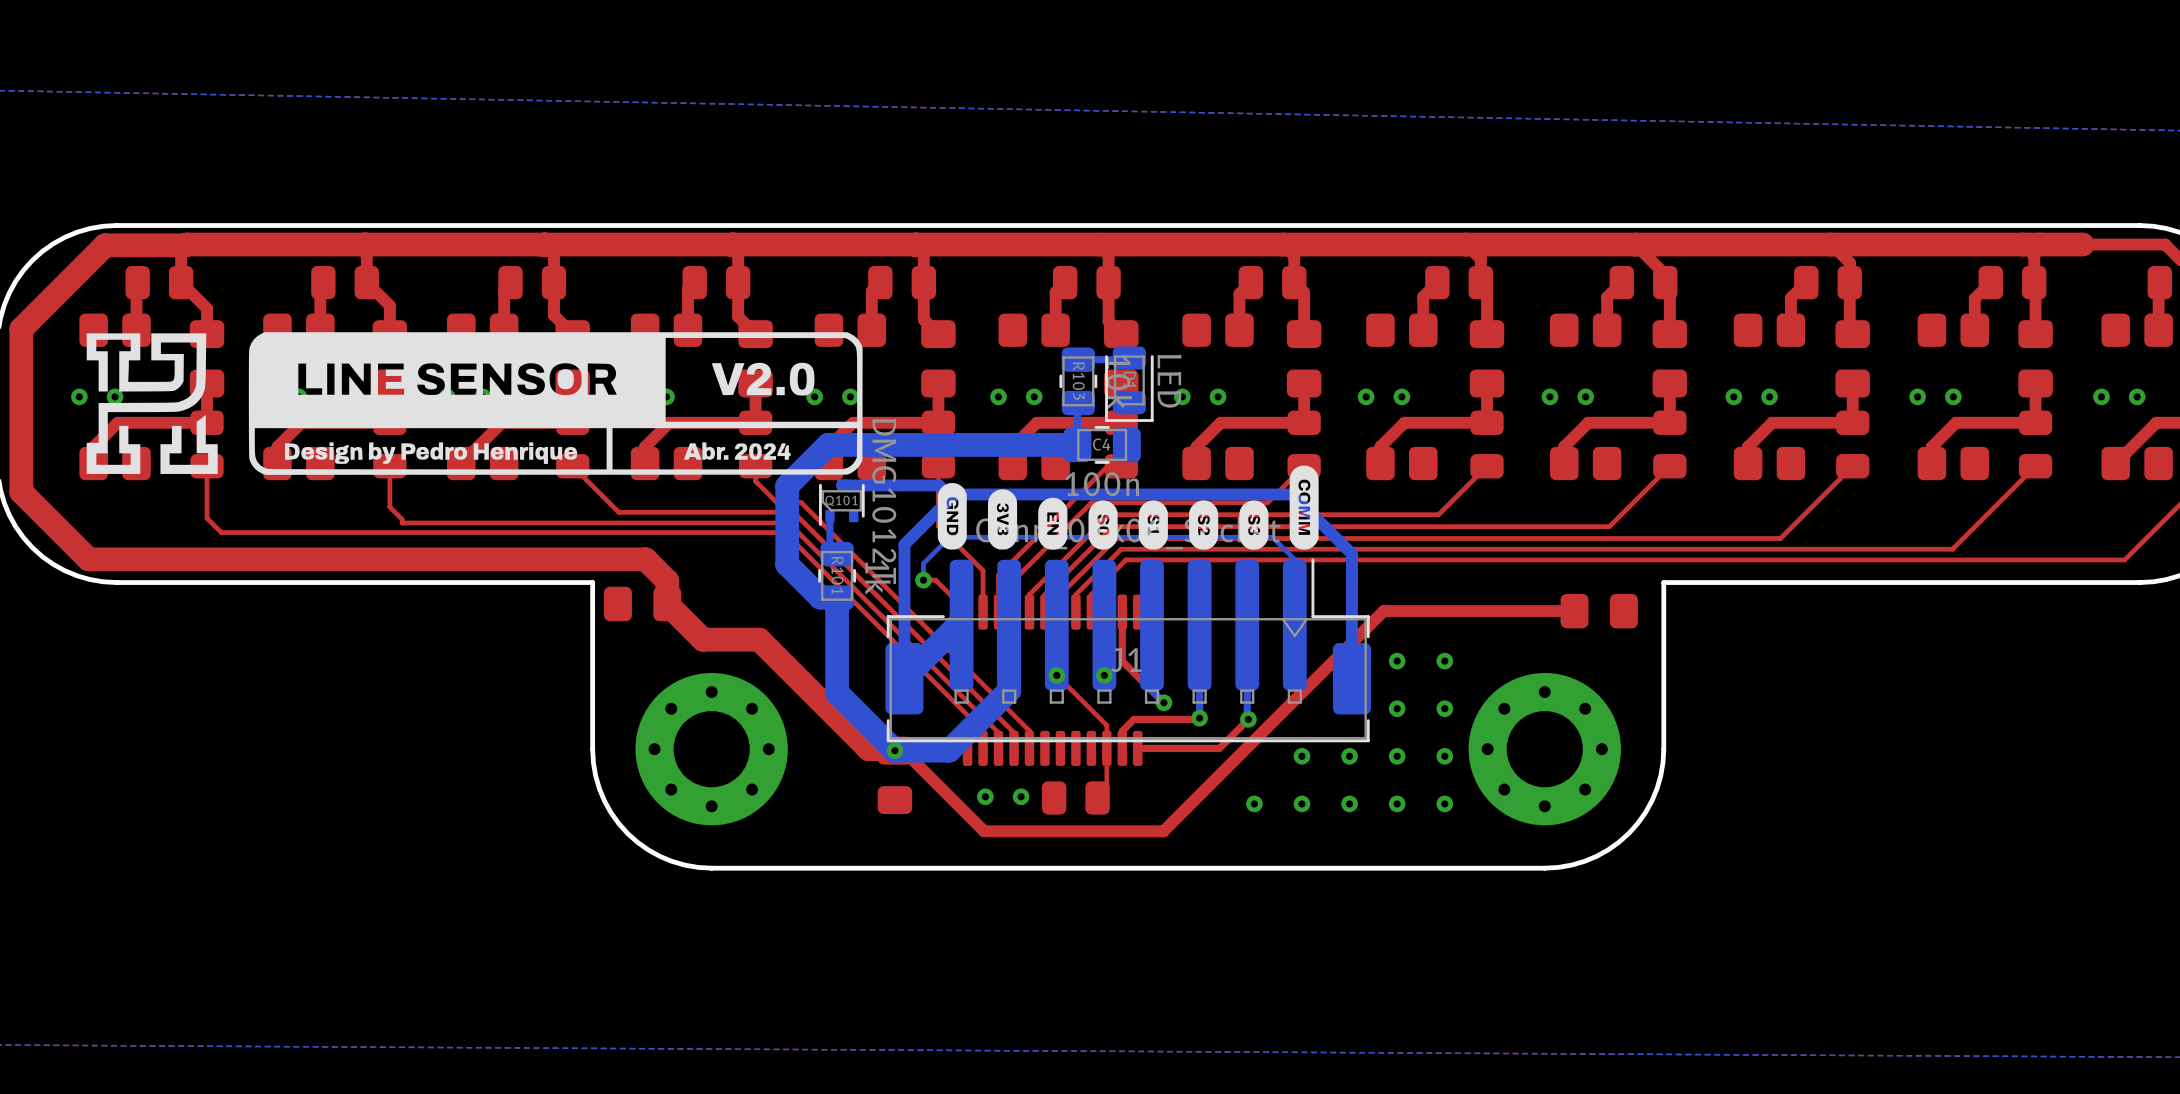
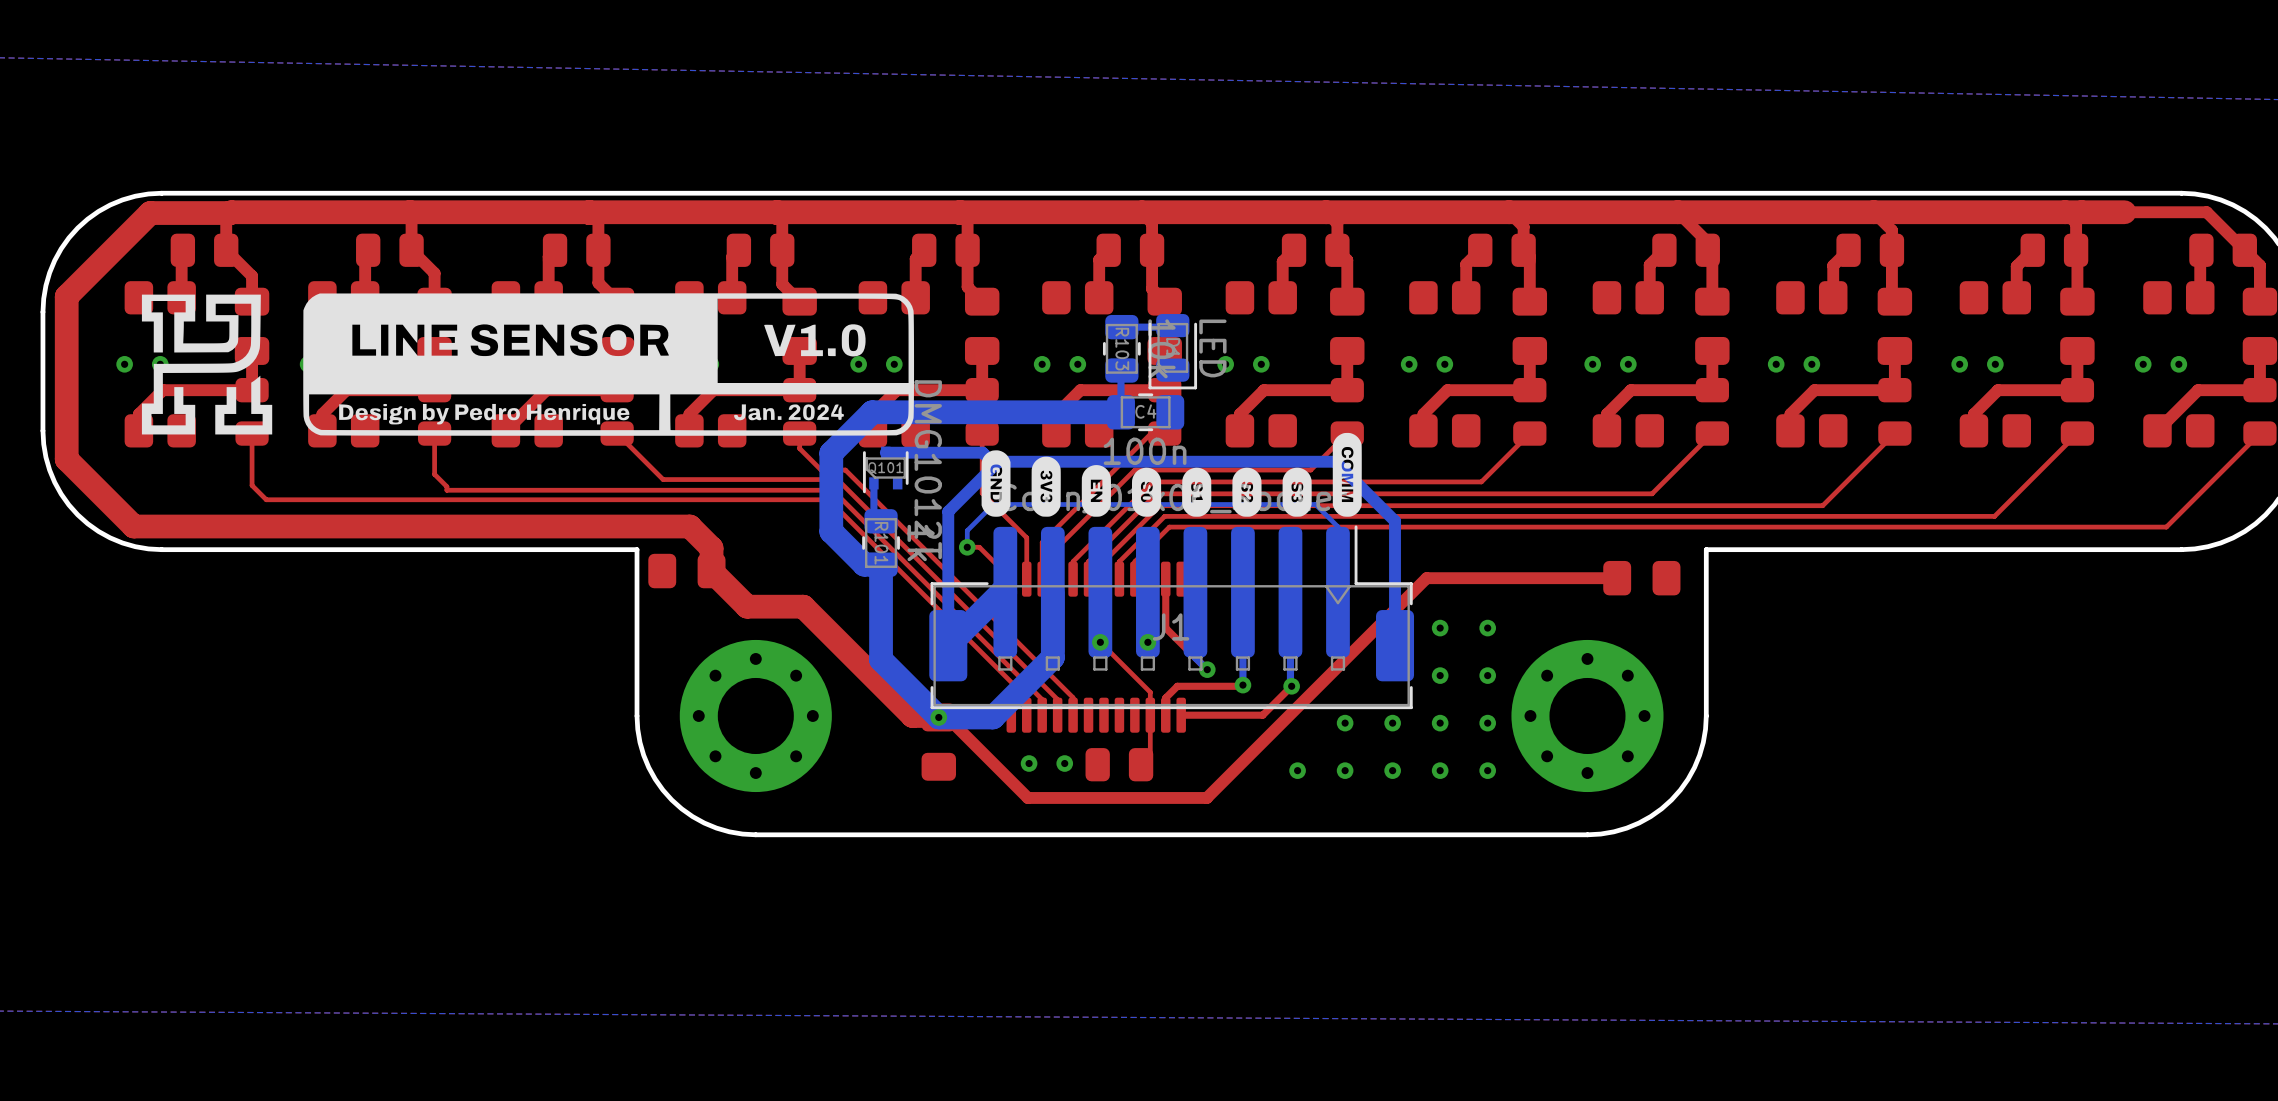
drawing shape: [86, 332, 863, 475] -> [141, 293, 915, 436]

